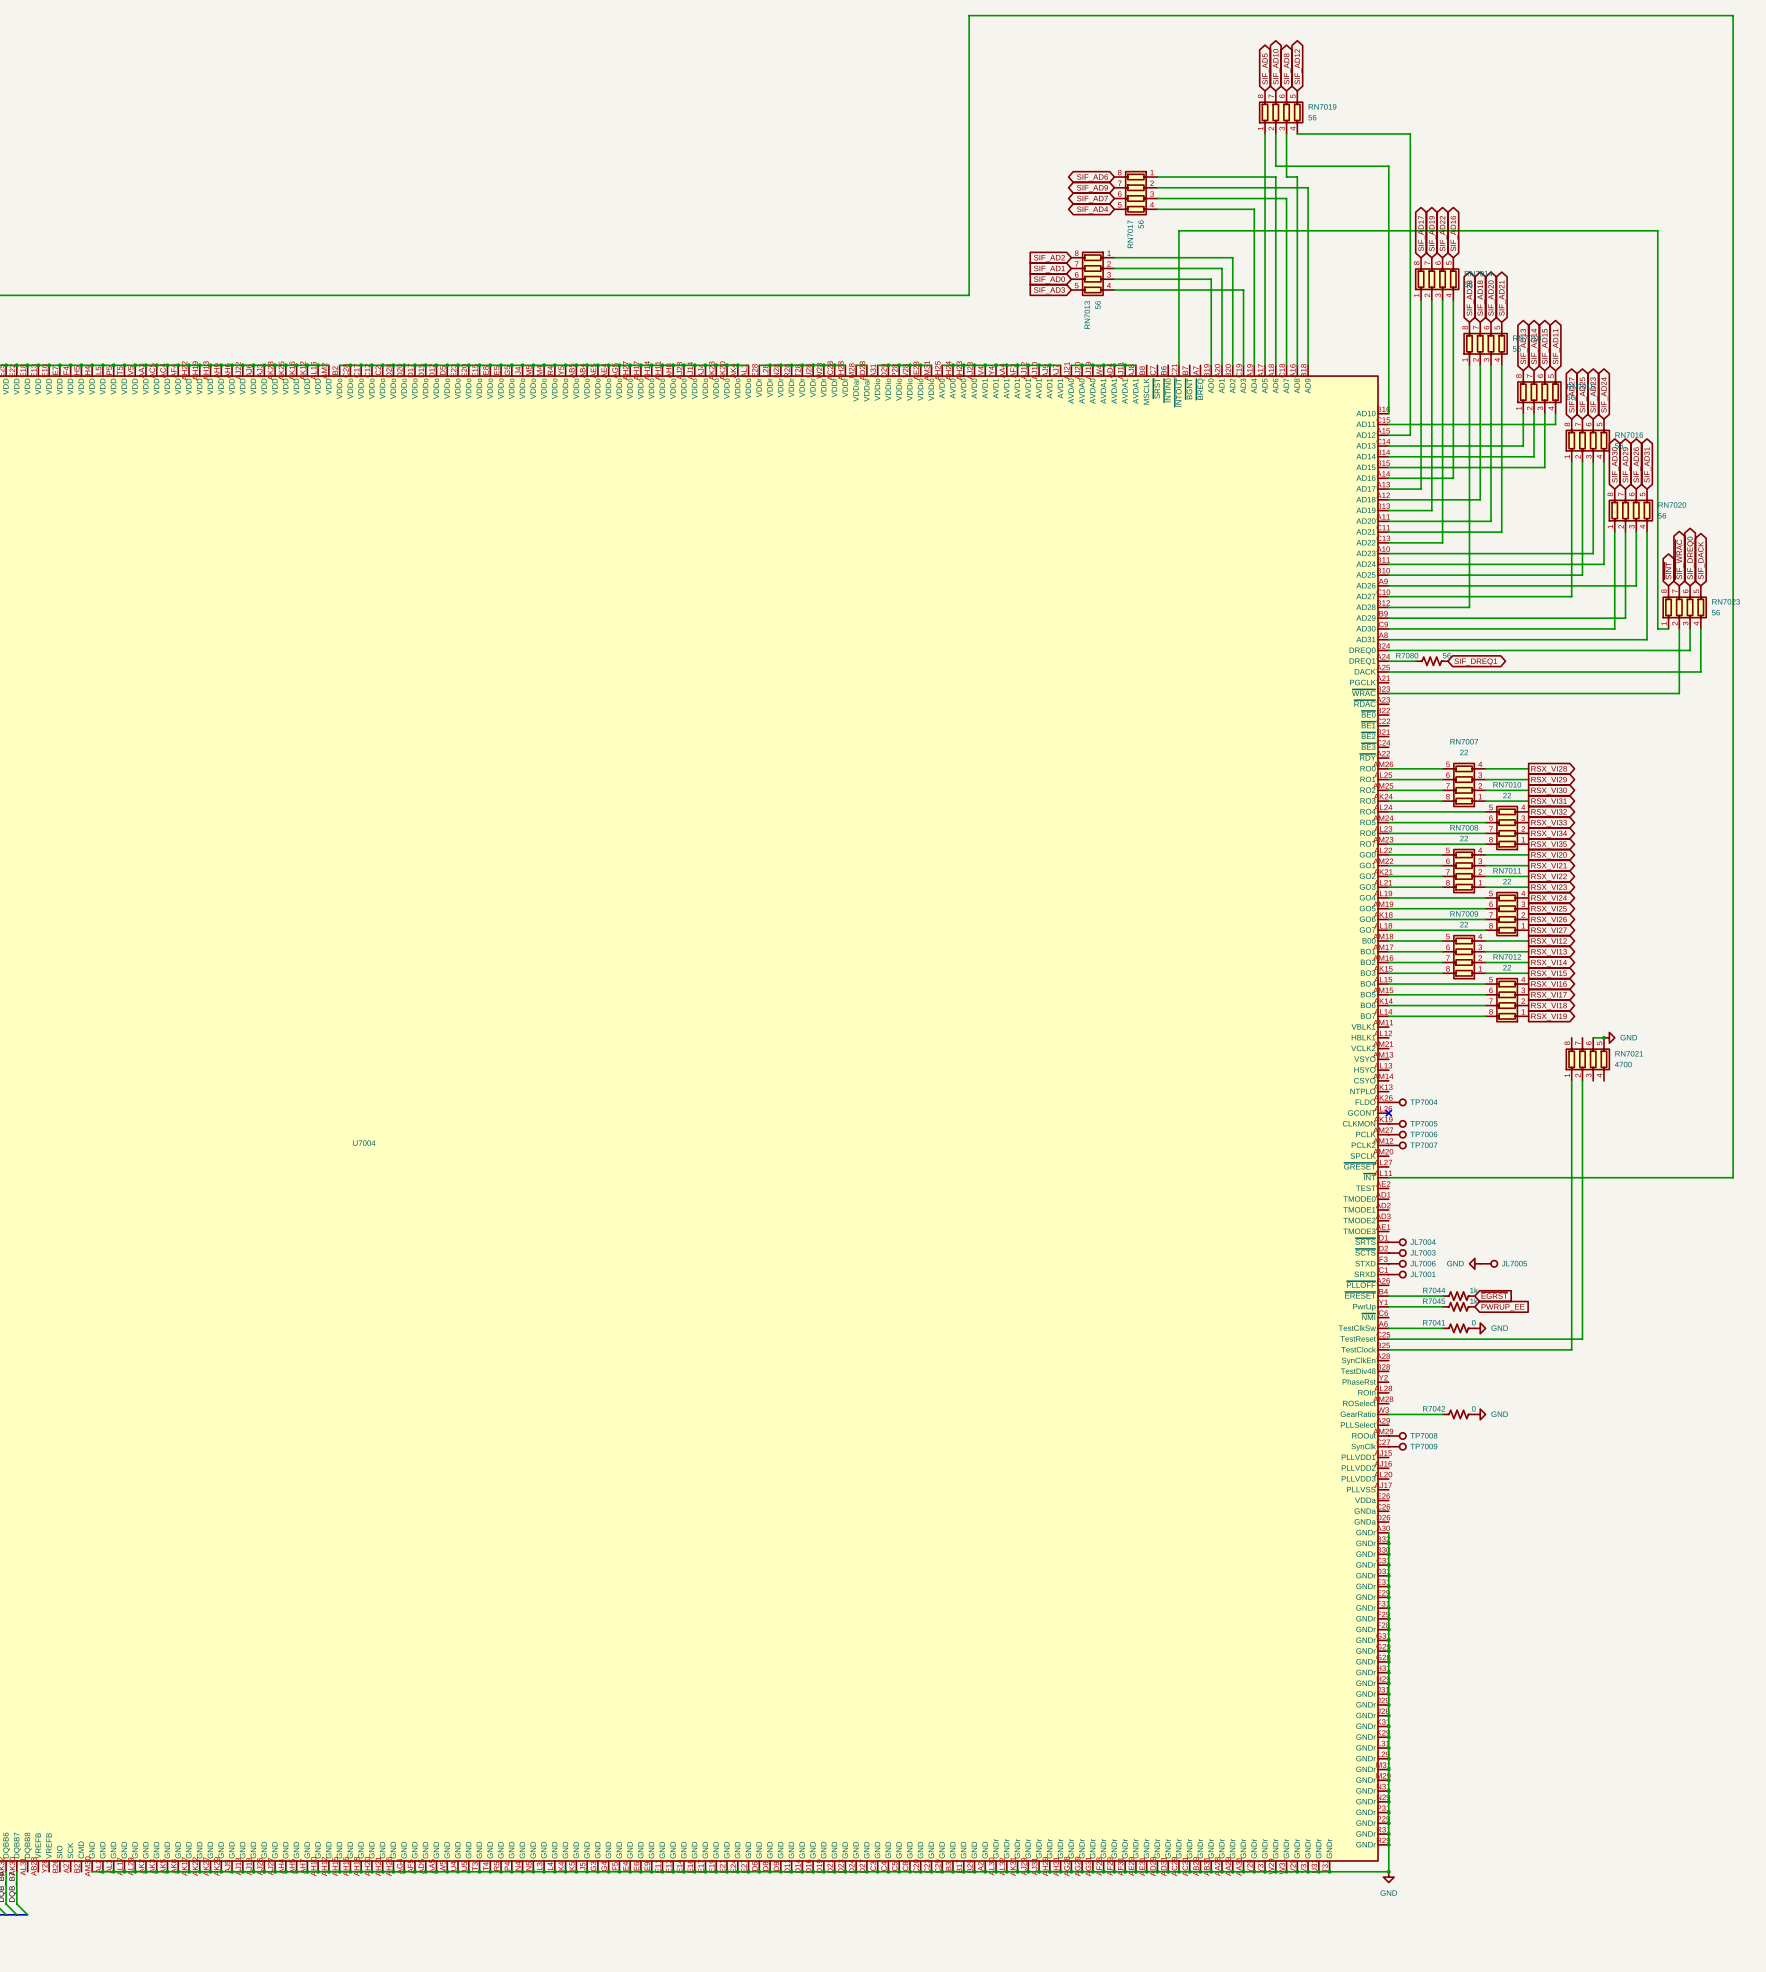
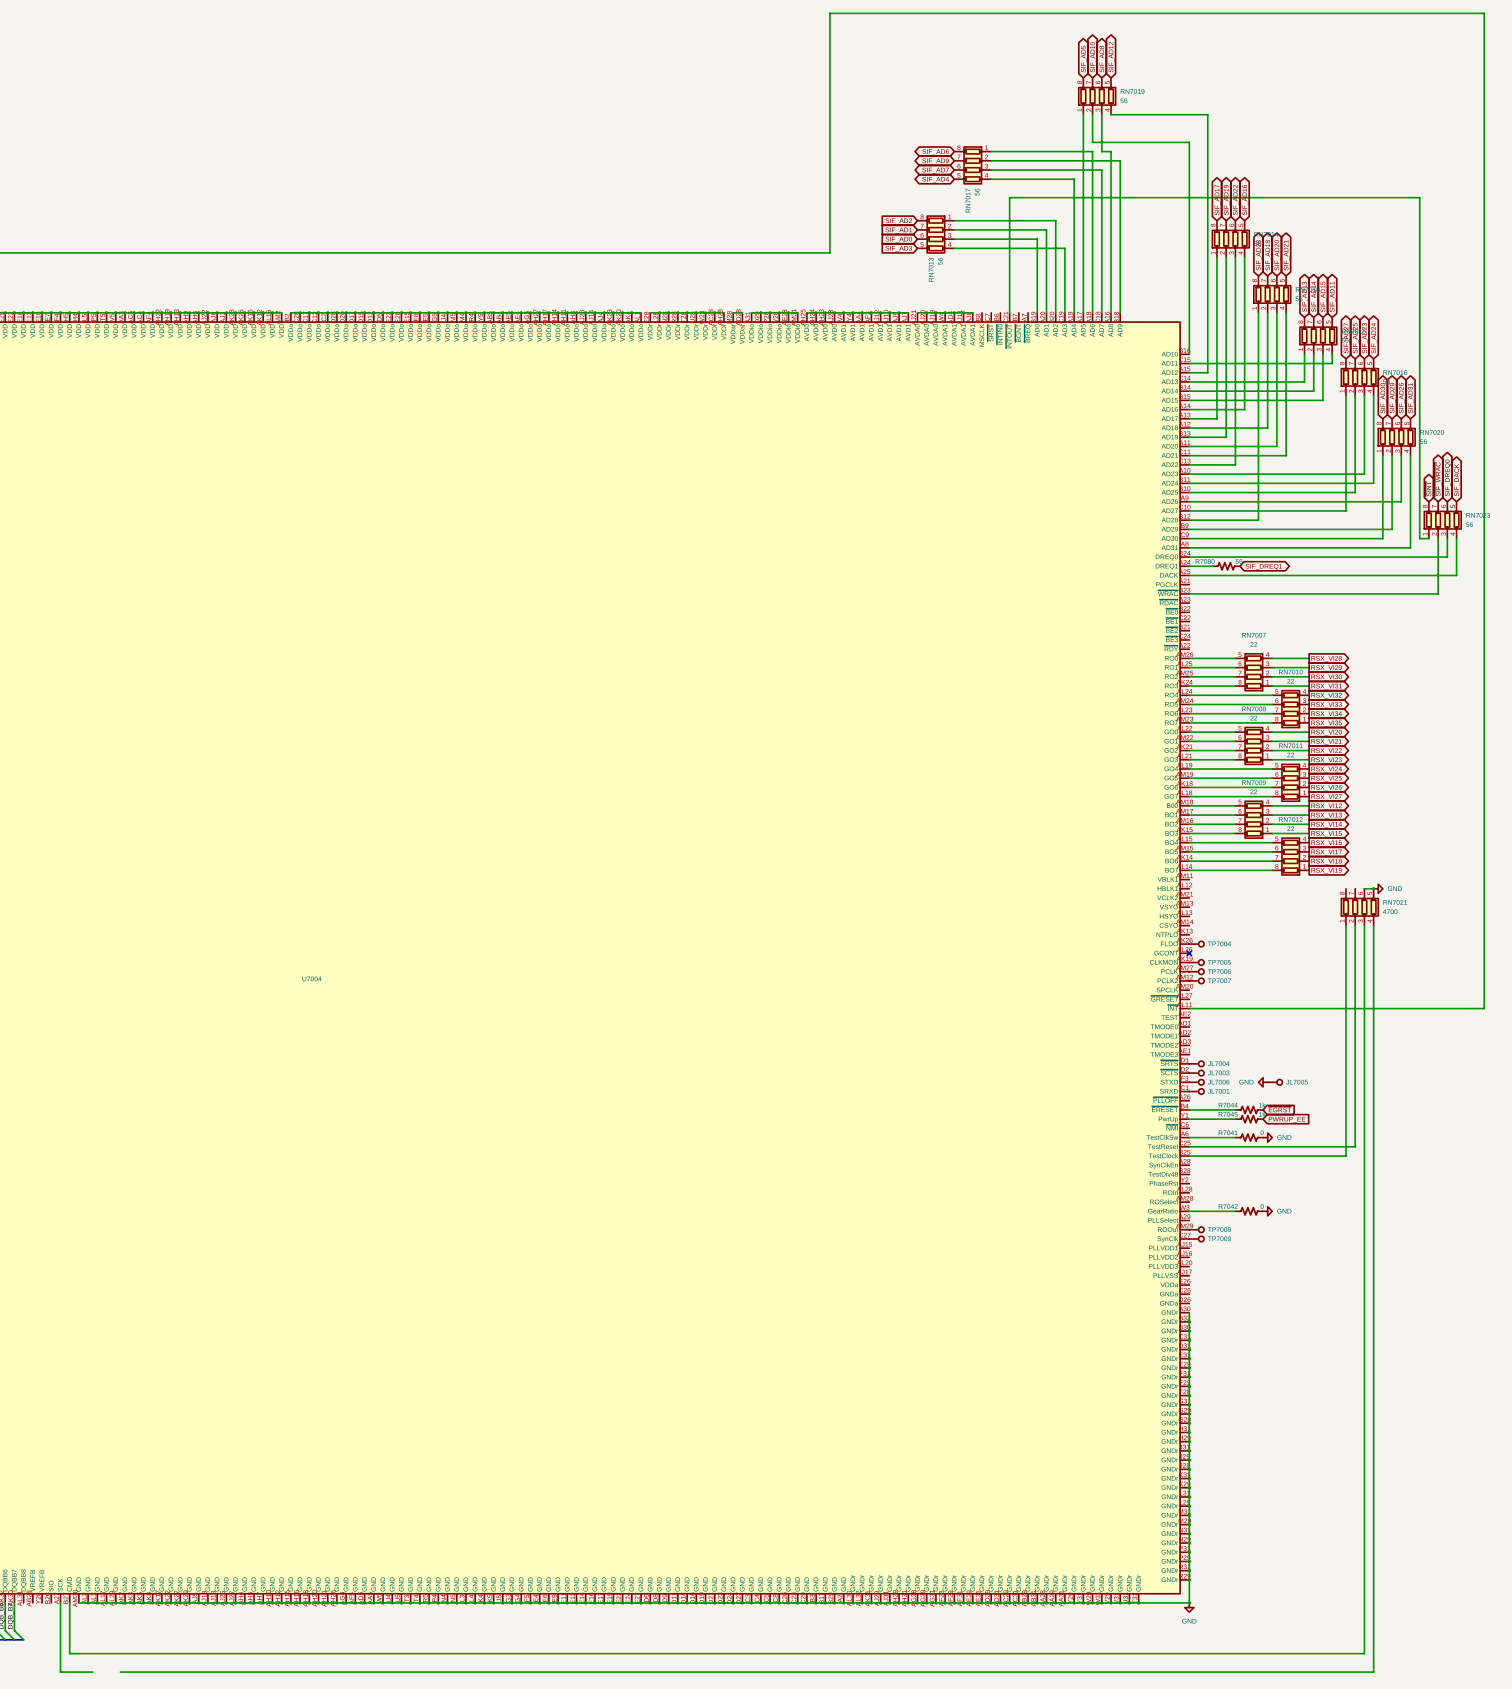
wire: none -> (1364, 925) (1364, 1653) (69, 1653) (69, 1602)
wire: none -> (1373, 925) (1373, 1672) (120, 1672)
wire: none -> (60, 1602) (60, 1672) (92, 1672)

